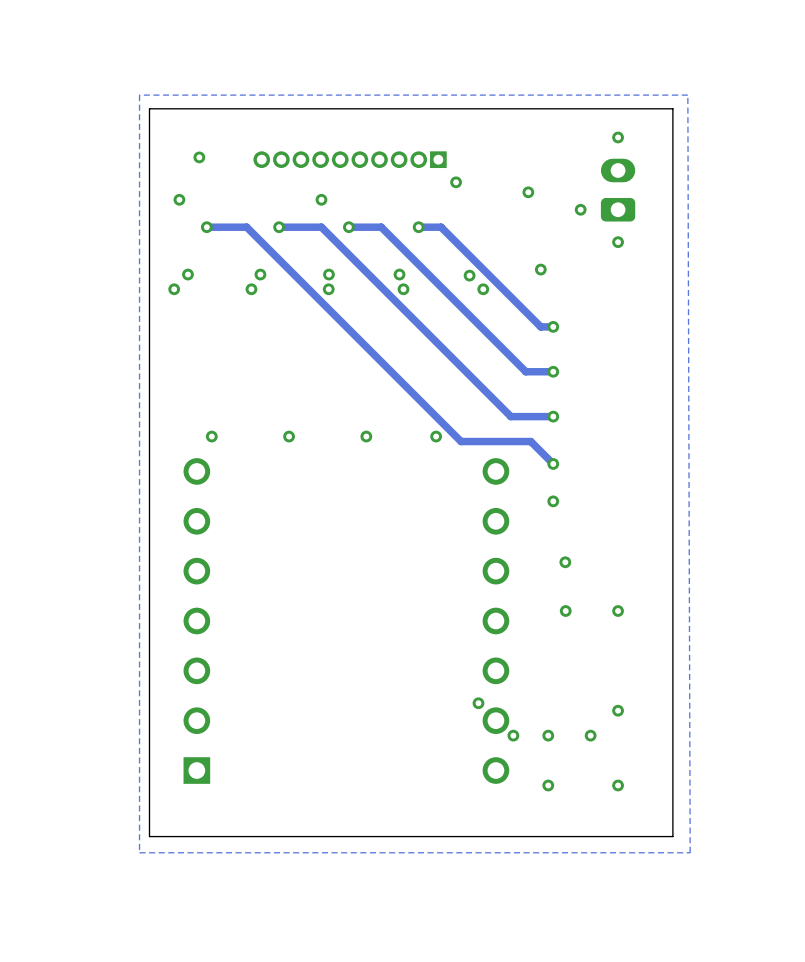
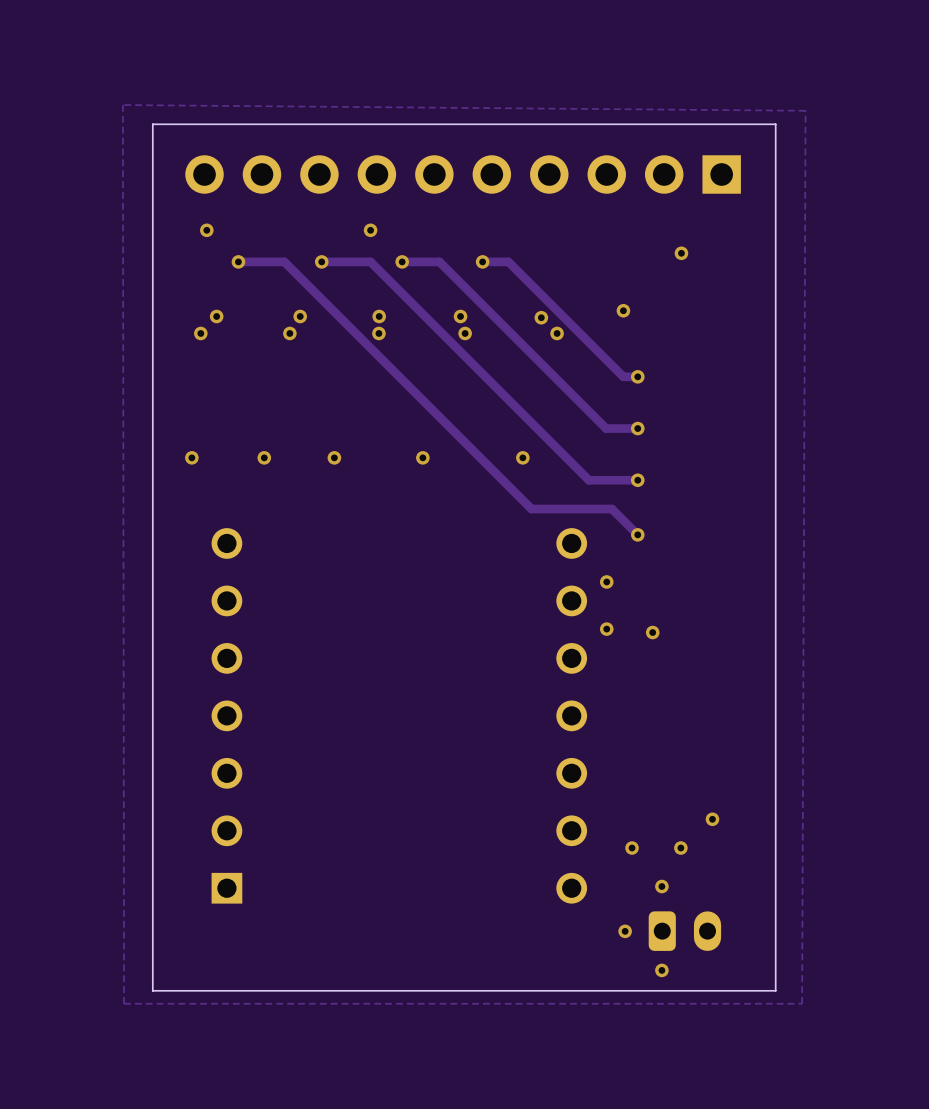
zone outline: (687, 95) (690, 852) (139, 852) (139, 95) (687, 95) -> (122, 105) (805, 110) (802, 1003) (124, 1003) (122, 105)
board edge: (672, 108) (149, 108) (149, 836) (672, 836) -> (775, 125) (152, 124) (152, 990) (775, 990) (775, 964)
via: (618, 137) -> none
part: none -> (463, 174)
via: (199, 157) -> none
part: (350, 159) -> none
via: (456, 182) -> none
part: (618, 190) -> none
via: (528, 192) -> none
via position: (580, 209) -> (681, 253)
via: (618, 242) -> none
via: none -> (191, 457)
via: none -> (264, 457)
via: none -> (334, 457)
via: none -> (522, 457)
via: (211, 436) -> none
via: (289, 436) -> none
via position: (366, 436) -> (422, 457)
via: (436, 436) -> none
via: (553, 501) -> none
via: none -> (606, 581)
via: none -> (606, 629)
via position: (565, 562) -> (652, 632)
via: (565, 611) -> none
via: (618, 611) -> none
via: (478, 703) -> none
via: (513, 735) -> none
via: none -> (661, 886)
via: (548, 785) -> none
via: (618, 785) -> none
via: none -> (625, 931)
part: none -> (684, 931)
via: none -> (661, 970)

